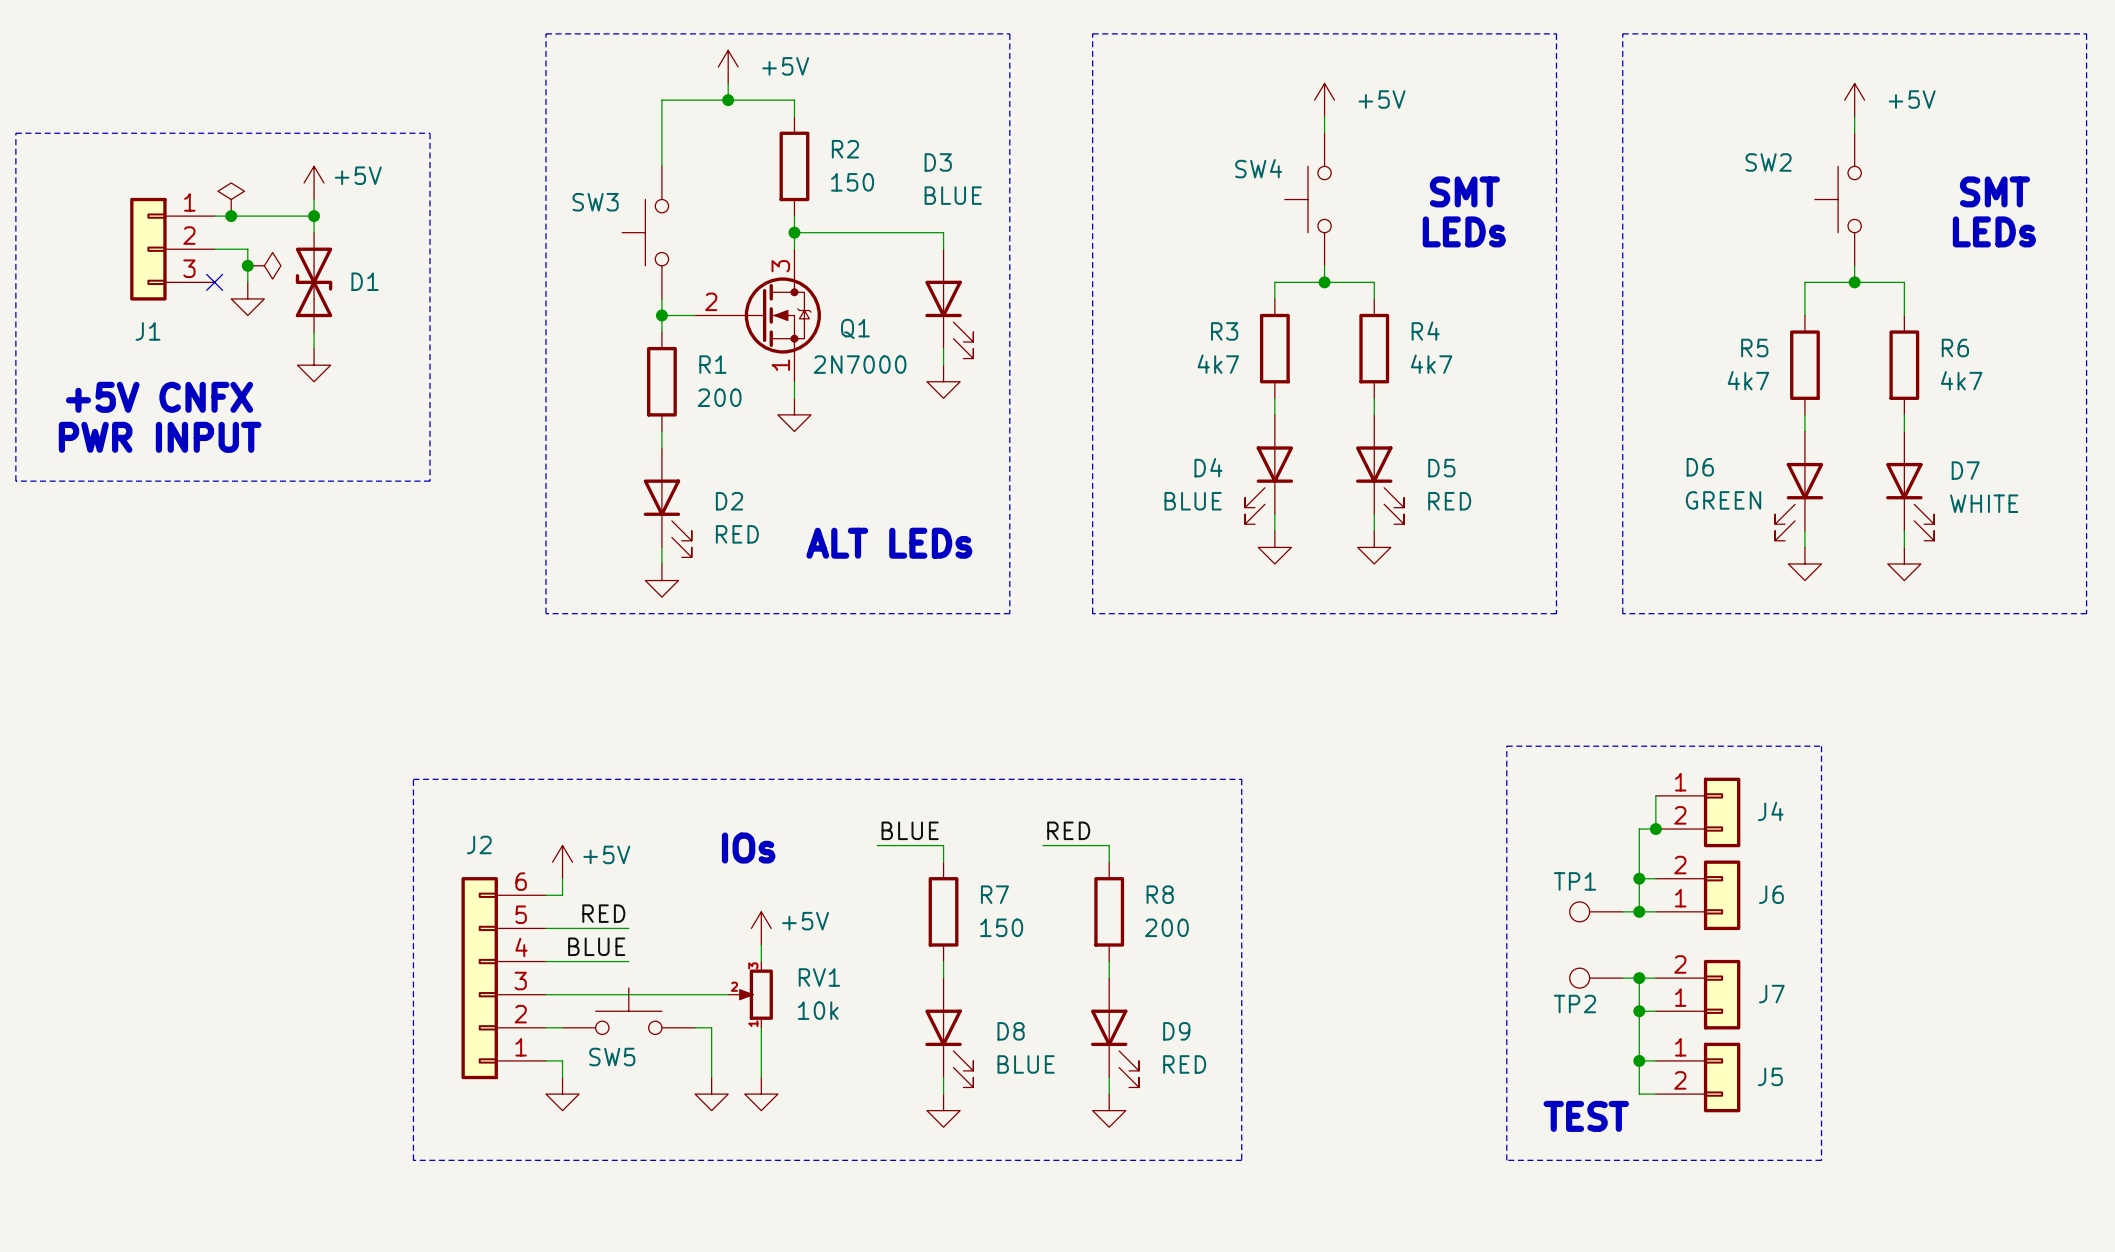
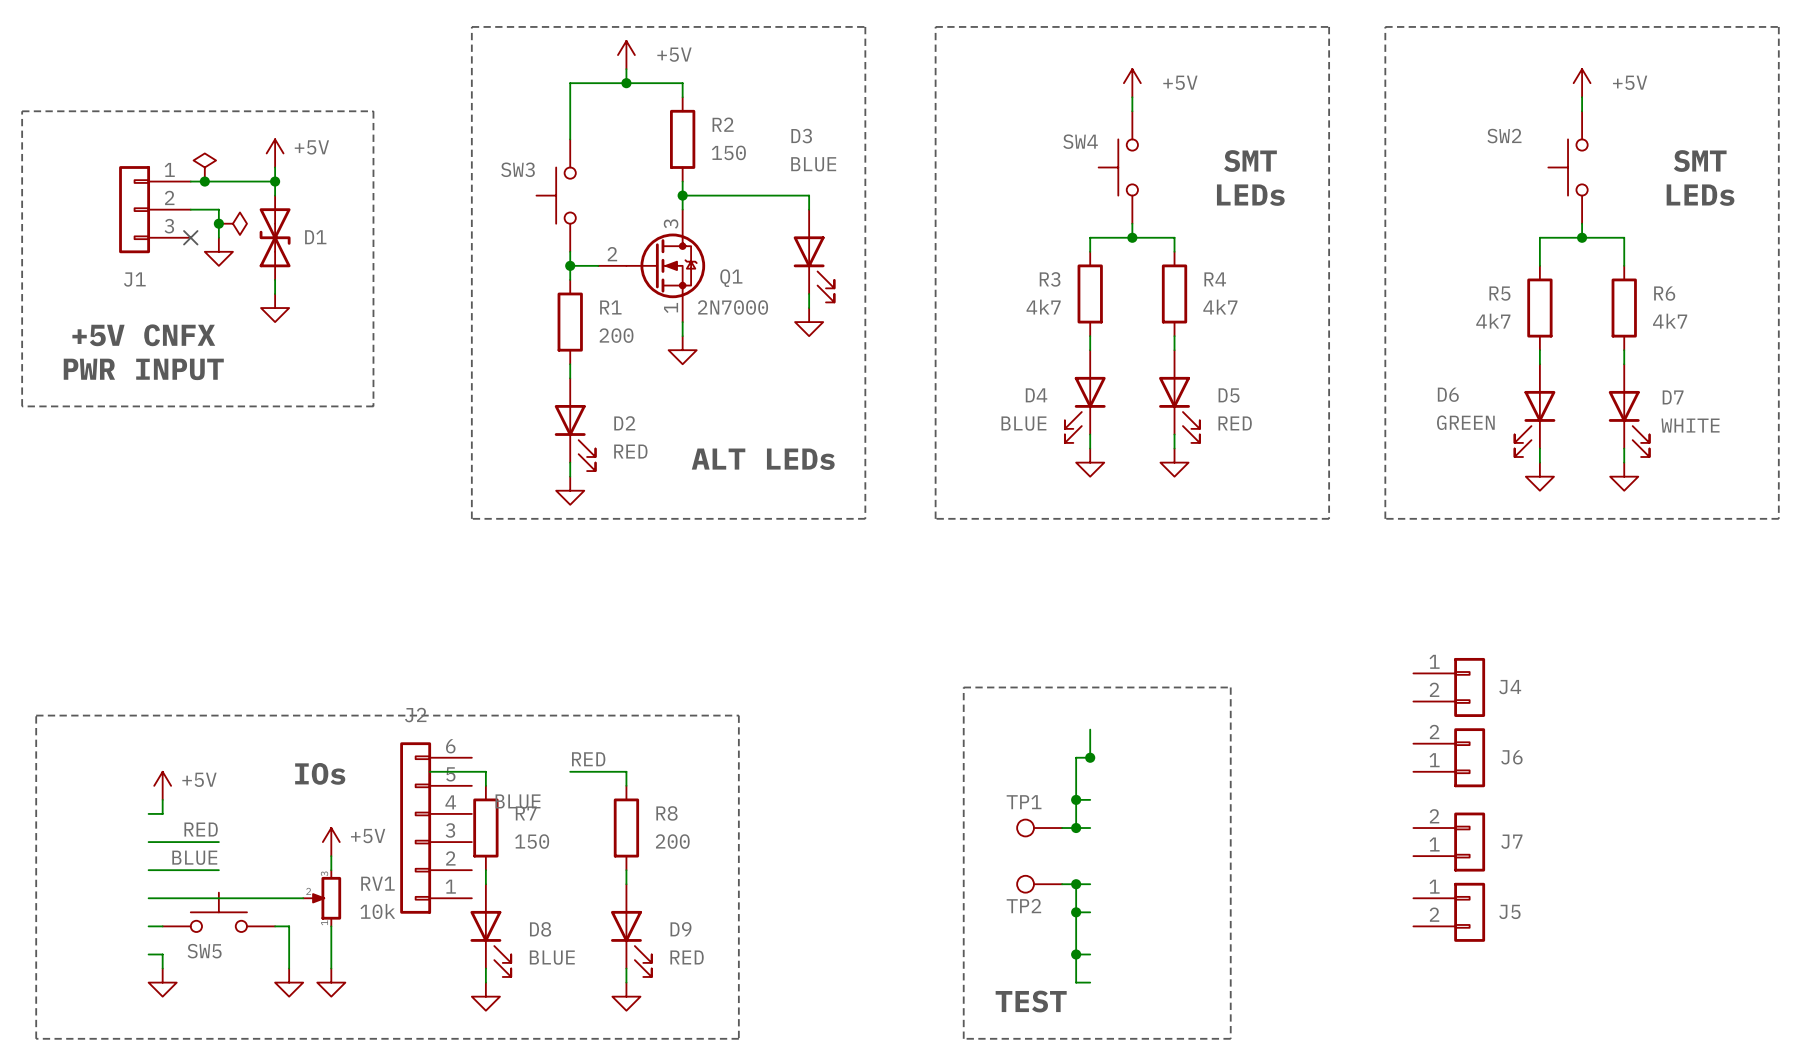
line: (1506, 746) (1821, 746) (1821, 1160) (1506, 1160) (1506, 746) -> none
line: (413, 779) (1241, 779) (1241, 1160) (413, 1160) (413, 779) -> none
wire: (1655, 795) (1655, 829) (1639, 829) (1639, 911) -> none
line: none -> (963, 687) (1230, 687) (1230, 1038) (963, 1038) (963, 687)
junction: (1655, 829) -> none
label: BLUE (910, 830) -> none
label: RED (1068, 830) -> none
line: none -> (36, 715) (738, 715) (738, 1038) (36, 1038) (36, 715)
wire: (877, 845) (943, 845) (943, 862) -> (570, 771) (626, 771) (626, 785)
wire: (1042, 845) (1109, 845) (1109, 862) -> none
text: IOs (748, 848) -> none
power symbol: +5V (562, 862) -> none
wire: none -> (1090, 729) (1090, 757) (1076, 757) (1076, 828)
wire: (562, 878) (562, 895) (545, 895) -> none
wire: (1639, 878) (1655, 878) -> none
junction: (1639, 878) -> none
junction: none -> (1090, 757)
wire: none -> (429, 771) (485, 771) (485, 785)
R7 position: (943, 911) -> (485, 828)
R8 position: (1109, 911) -> (626, 828)
TP1 position: (1596, 911) -> (1039, 828)
wire: (1622, 911) (1655, 911) -> none
junction: (1639, 911) -> none
label position: RED (603, 913) -> RED (588, 759)
text: none -> IOs (320, 773)
power symbol: none -> +5V (162, 785)
wire: (545, 928) (628, 928) -> none
power symbol: +5V (761, 928) -> none
wire: none -> (162, 799) (162, 813) (148, 813)
wire: (761, 944) (761, 961) -> (485, 968) (485, 982)
wire: none -> (1076, 799) (1090, 799)
junction: none -> (1076, 799)
wire: (545, 961) (628, 961) -> none
wire: (943, 961) (943, 978) -> (626, 870) (626, 884)
wire: (1109, 961) (1109, 978) -> none
wire: none -> (1062, 828) (1090, 828)
junction: none -> (1076, 828)
TP2 position: (1596, 978) -> (1039, 884)
wire: (1622, 978) (1655, 978) -> none
wire: (1639, 978) (1639, 1094) (1655, 1094) -> none
junction: (1639, 978) -> none
label: none -> RED (201, 829)
wire: none -> (148, 842) (218, 842)
power symbol: none -> +5V (331, 842)
wire: (545, 994) (728, 994) -> none
RV1 position: (750, 994) -> (322, 898)
wire: none -> (331, 856) (331, 870)
SW5 position: (628, 1011) -> (218, 912)
wire: (1639, 1011) (1655, 1011) -> none
junction: (1639, 1011) -> none
label: none -> BLUE (194, 857)
wire: none -> (148, 870) (218, 870)
wire: (545, 1027) (562, 1027) -> (485, 884) (485, 870)
wire: (695, 1027) (711, 1027) (711, 1077) -> none
wire: (761, 1027) (761, 1077) -> none
D8 position: (949, 1032) -> (490, 930)
D9 position: (1115, 1032) -> (631, 930)
wire: none -> (1062, 884) (1090, 884)
wire: none -> (1076, 884) (1076, 982) (1090, 982)
junction: none -> (1076, 884)
wire: none -> (148, 898) (303, 898)
wire: (545, 1060) (562, 1060) (562, 1077) -> none
wire: (1639, 1060) (1655, 1060) -> none
junction: (1639, 1060) -> none
wire: (943, 1077) (943, 1094) -> (626, 968) (626, 982)
wire: (1109, 1077) (1109, 1094) -> none
wire: none -> (1076, 912) (1090, 912)
junction: none -> (1076, 912)
wire: none -> (148, 926) (162, 926)
wire: none -> (275, 926) (289, 926) (289, 968)
wire: none -> (331, 926) (331, 968)
power symbol position: (562, 1094) -> (485, 996)
power symbol: (711, 1094) -> none
power symbol: (761, 1094) -> none
power symbol: (943, 1110) -> none
power symbol: (1109, 1110) -> none
text: TEST (1586, 1116) -> none
wire: none -> (148, 954) (162, 954) (162, 968)
wire: none -> (1076, 954) (1090, 954)
junction: none -> (1076, 954)
power symbol: none -> (162, 982)
power symbol: none -> (289, 982)
power symbol: none -> (331, 982)
power symbol: none -> (626, 996)
text: none -> TEST (1031, 1001)

